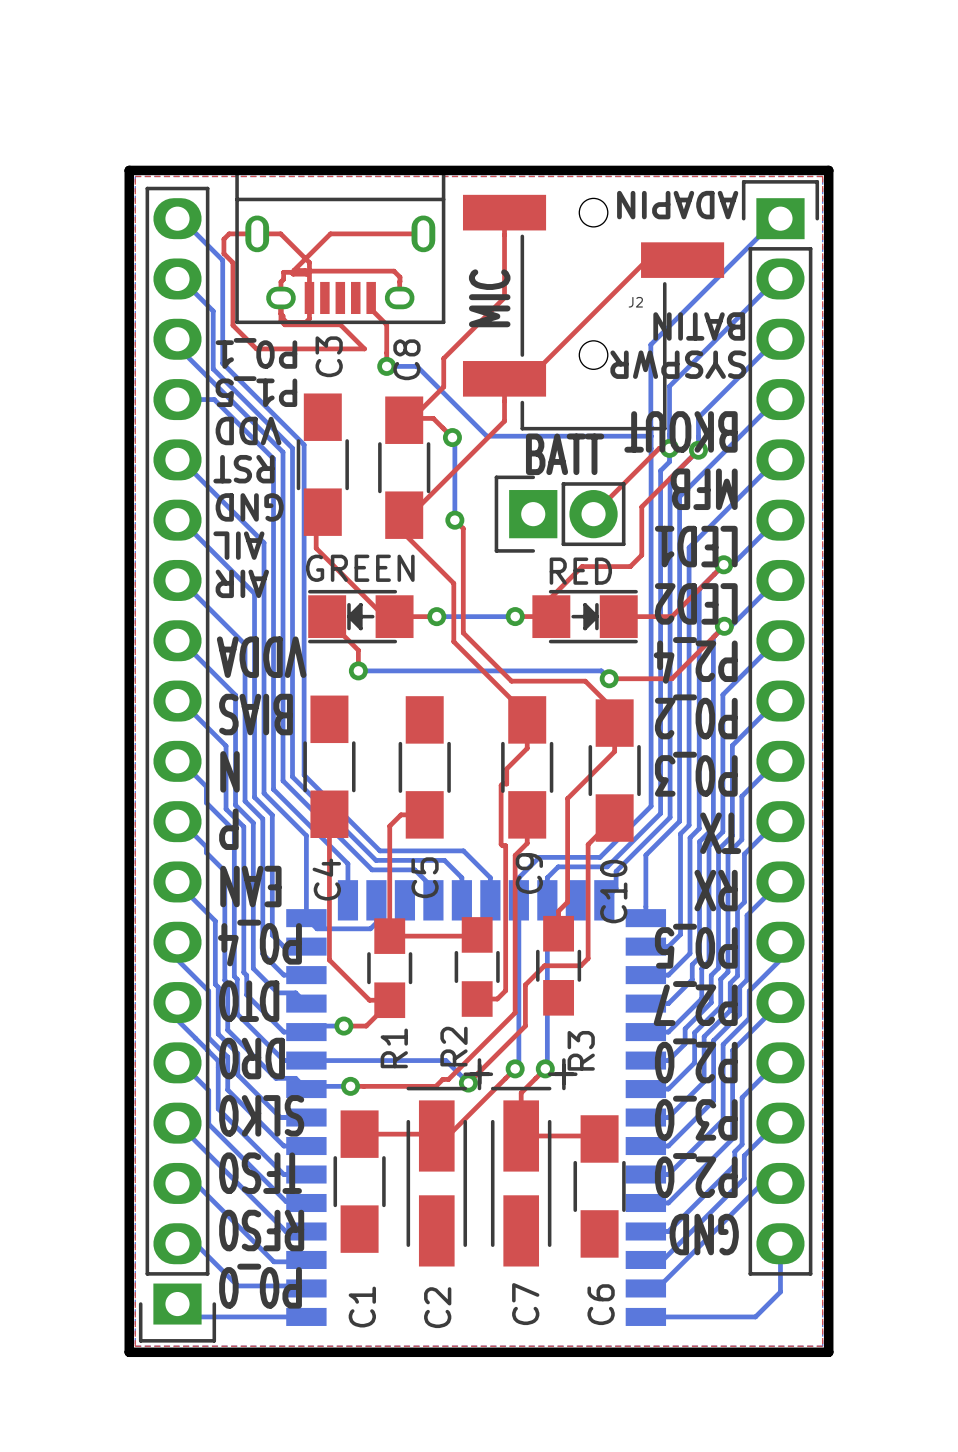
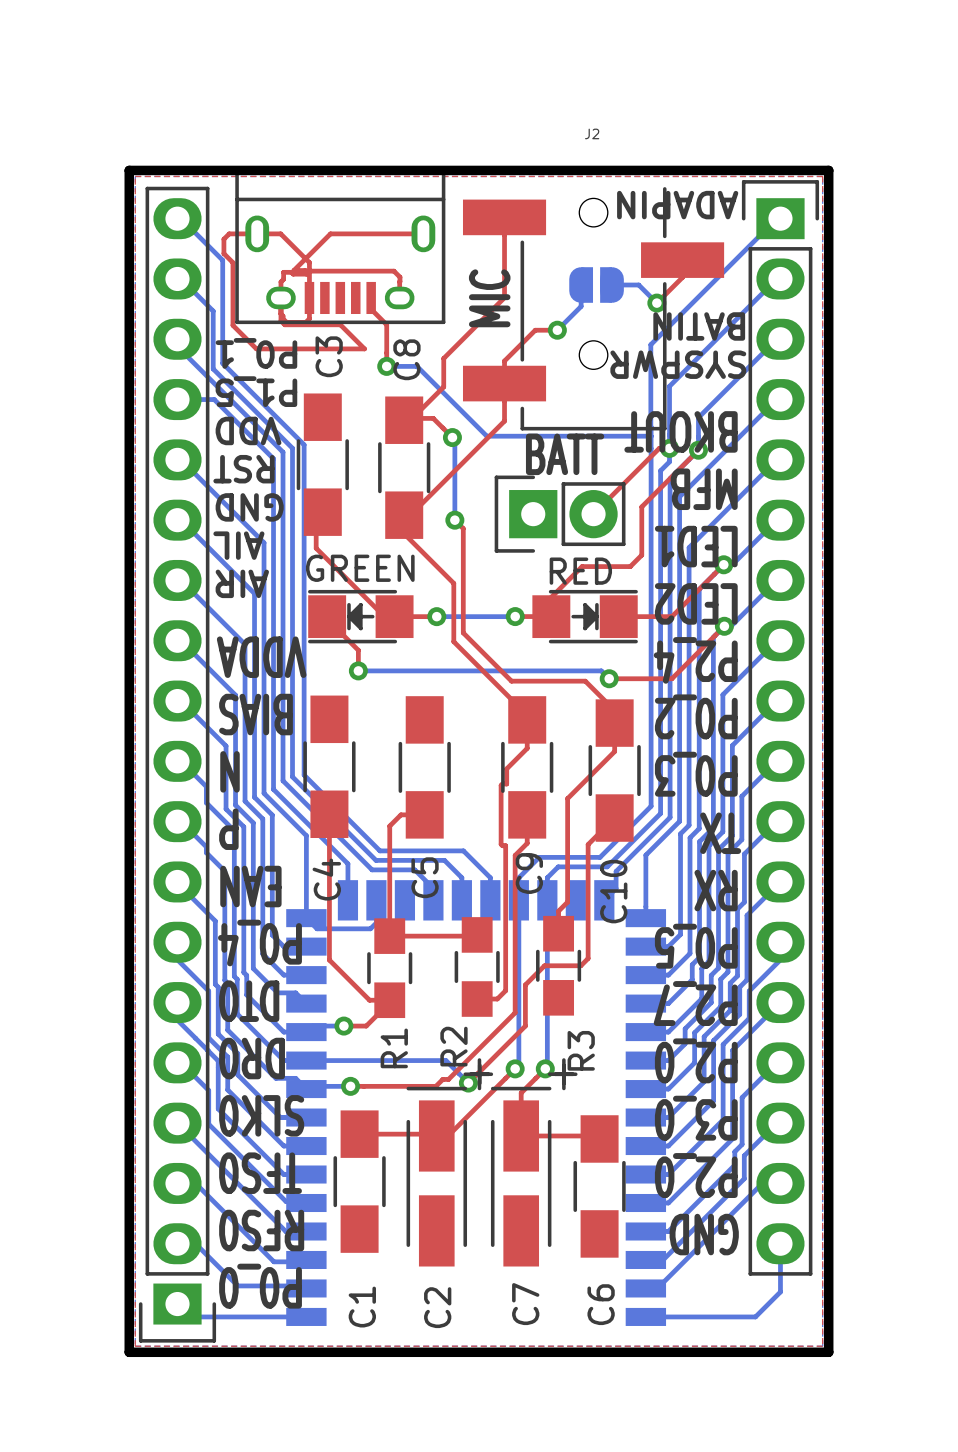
J2 footprint: [462, 194, 725, 431] -> [462, 187, 725, 431]
top track: (646, 260) (528, 378) -> none
top track: none -> (682, 260) (682, 277) (656, 303)
bottom track: none -> (587, 285) (581, 290) (581, 306) (557, 330)
part: none -> (596, 285)
bottom track: none -> (606, 285) (638, 285) (656, 303)
J2 name position: J2 (635, 302) -> J2 (592, 133)
via: none -> (656, 303)
top track: none -> (557, 330) (535, 330) (504, 361) (504, 378)
via: none -> (557, 330)

